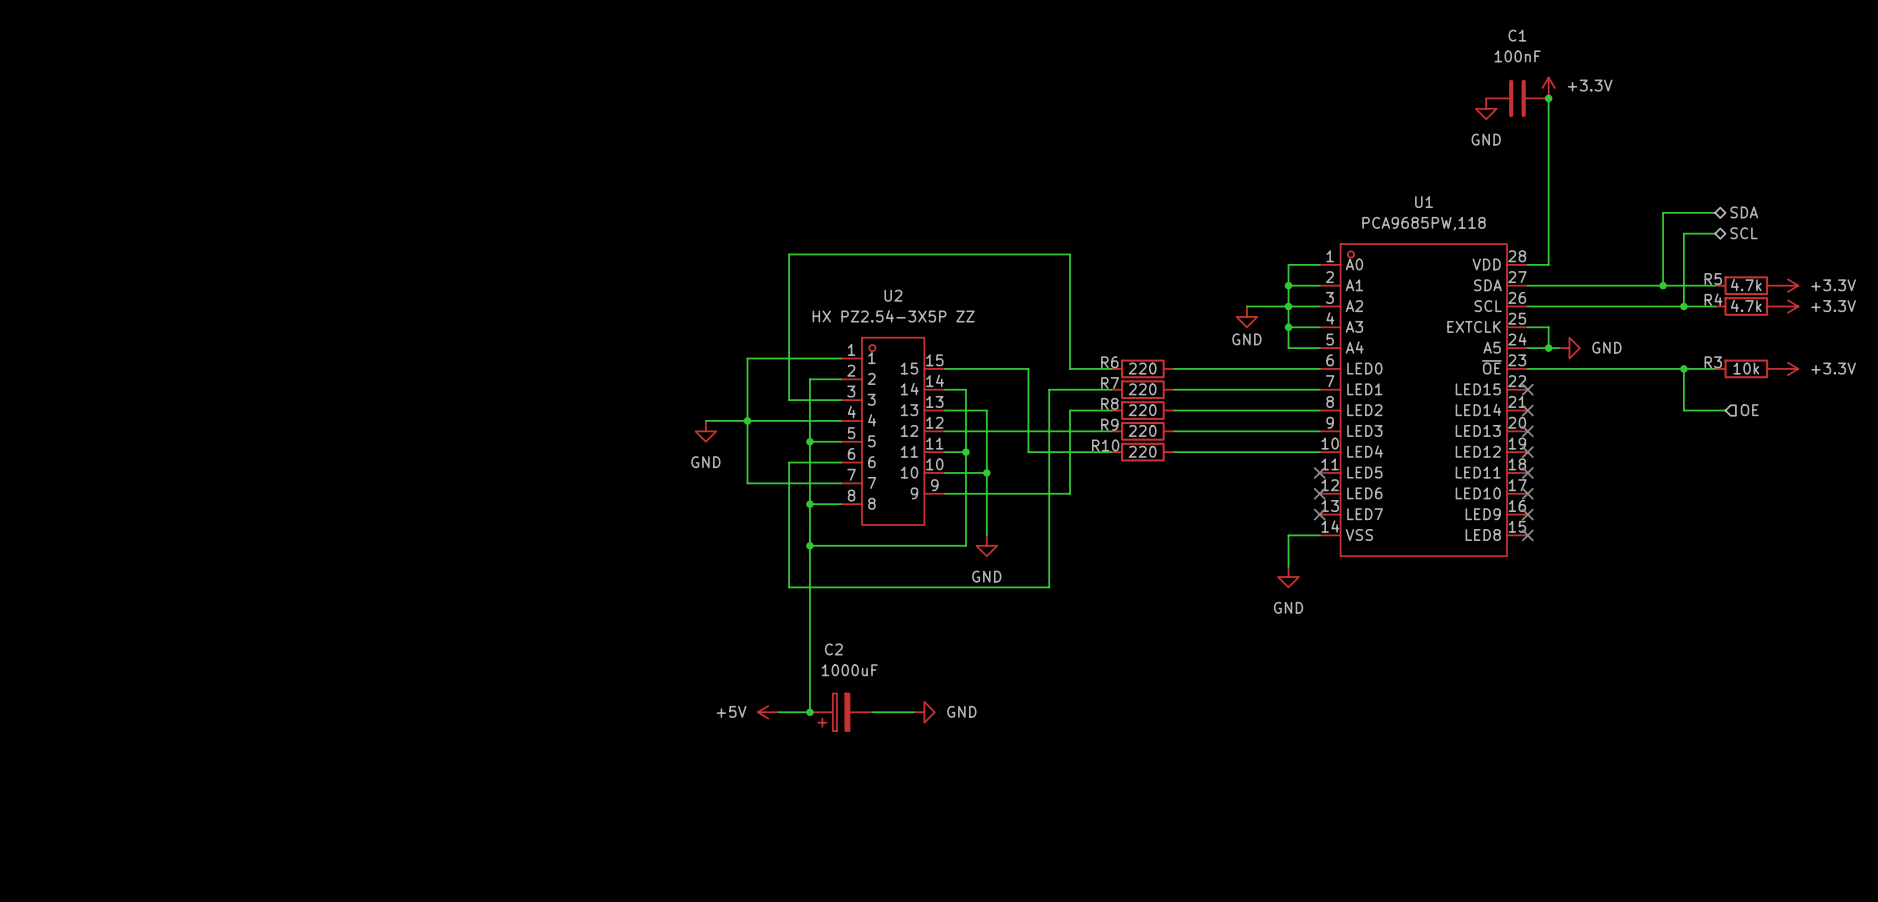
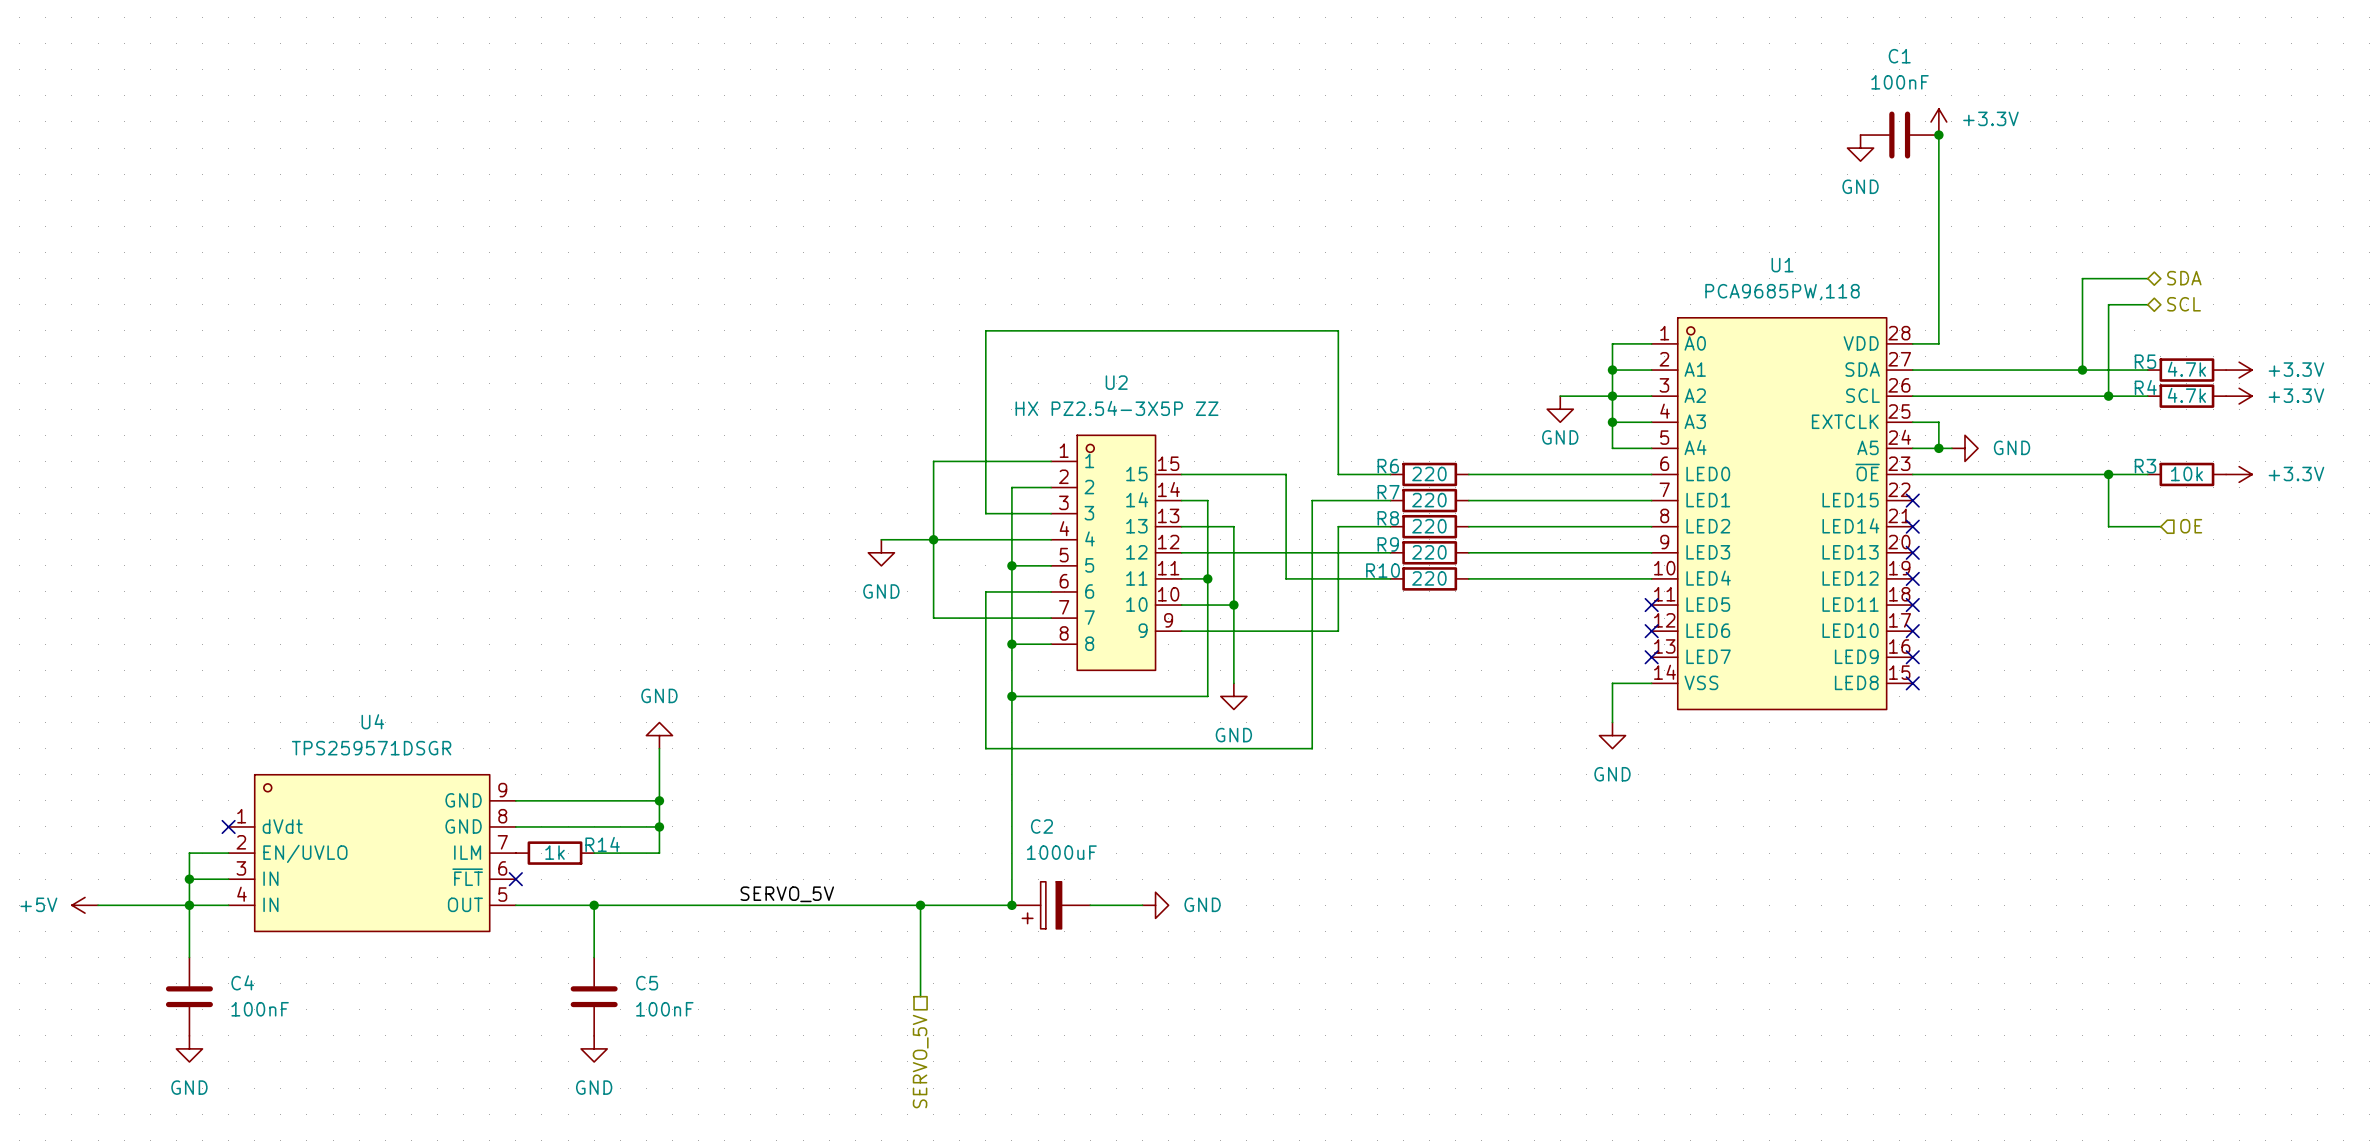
power symbol: none -> GND (659, 735)
wire: none -> (659, 748) (659, 853) (594, 853)
wire: none -> (515, 800) (659, 800)
junction: none -> (659, 800)
no-connect mark: none -> (228, 826)
wire: none -> (515, 826) (659, 826)
junction: none -> (659, 826)
wire: none -> (228, 853) (189, 853) (189, 957)
U4: none -> TPS259571DSGR (372, 853)
R14: none -> 1k (554, 853)
wire: none -> (189, 879) (228, 879)
junction: none -> (189, 879)
no-connect mark: none -> (515, 879)
label: none -> SERVO_5V (787, 894)
power symbol: none -> +5V (84, 905)
wire: none -> (98, 905) (228, 905)
junction: none -> (189, 905)
wire: none -> (515, 905) (972, 905)
wire: none -> (594, 905) (594, 957)
junction: none -> (594, 905)
wire: none -> (920, 905) (920, 996)
junction: none -> (920, 905)
power symbol: +5V (768, 712) -> none
C4: none -> 100nF (189, 996)
C5: none -> 100nF (594, 996)
power symbol: none -> GND (189, 1048)
power symbol: none -> GND (594, 1048)
hierarchical label: none -> SERVO_5V (920, 1061)

